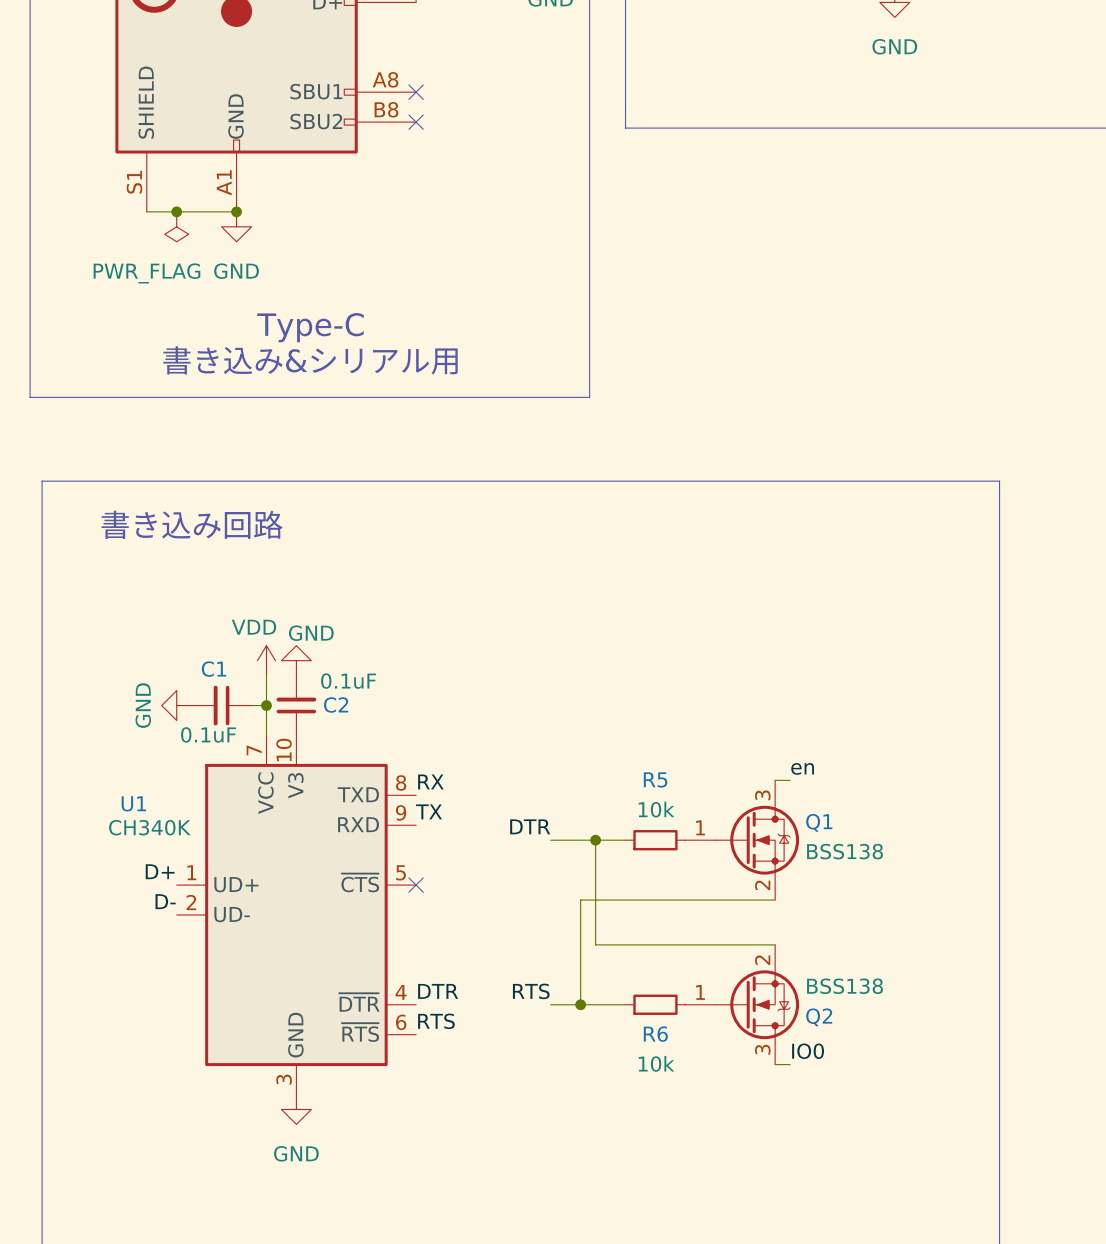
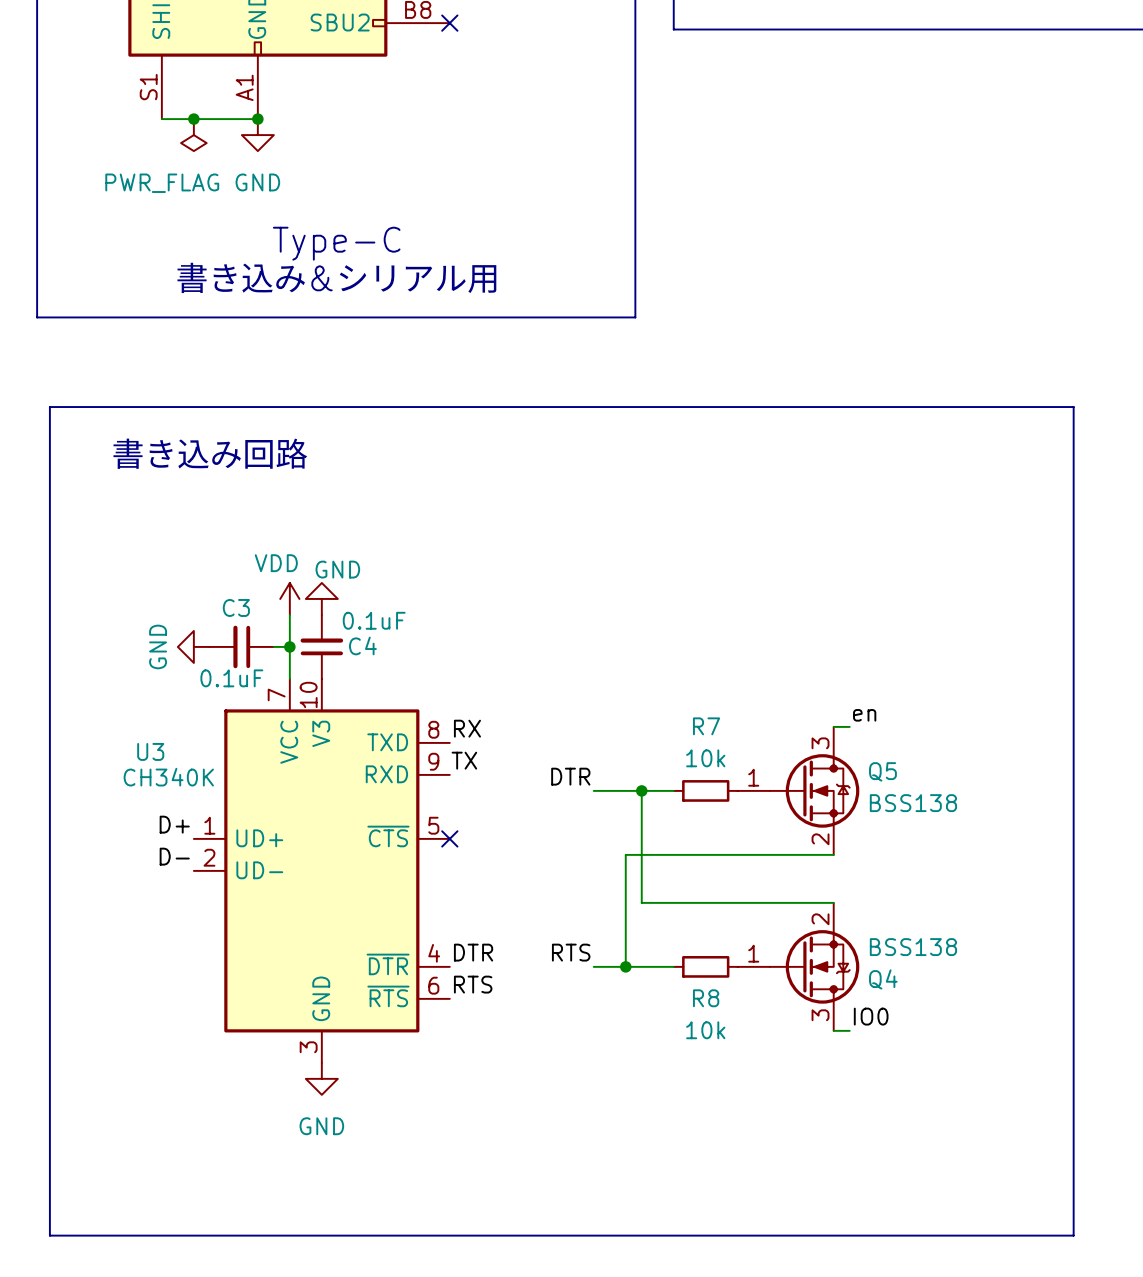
C1 name: C1 (213, 669) -> C3 (236, 607)
C2 name: C2 (336, 705) -> C4 (362, 645)
R5 name: R5 (655, 779) -> R7 (706, 726)
U1 name: U1 (133, 803) -> U3 (150, 751)
Q1 name: Q1 (819, 822) -> Q5 (882, 771)
Q2 name: Q2 (819, 1017) -> Q4 (883, 979)
R6 name: R6 (655, 1034) -> R8 (706, 998)

